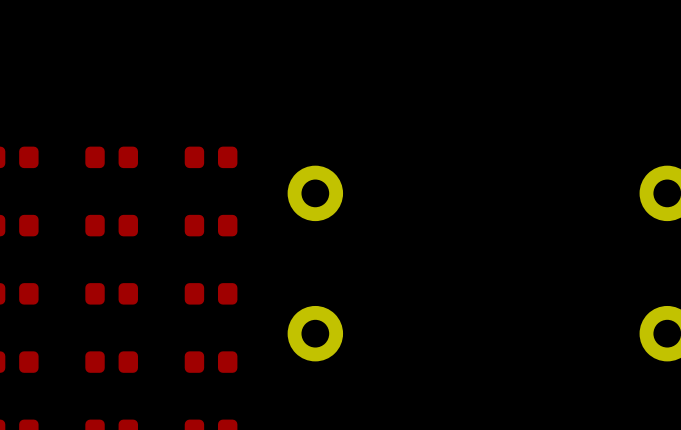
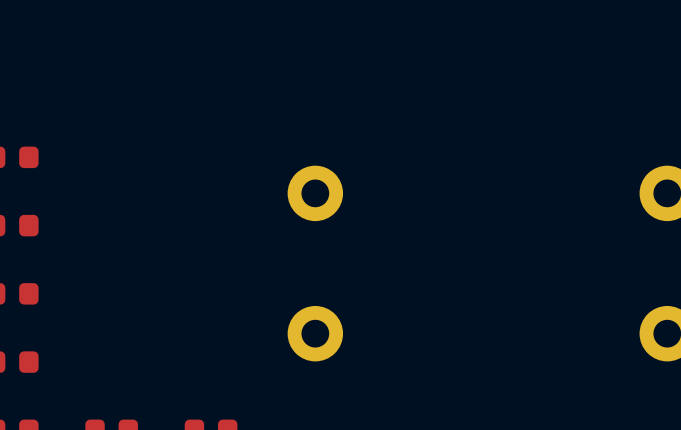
part: (111, 157) -> none
part: (211, 157) -> none
part: (111, 225) -> none
part: (211, 225) -> none
part: (111, 293) -> none
part: (211, 293) -> none
part: (111, 362) -> none
part: (211, 362) -> none

